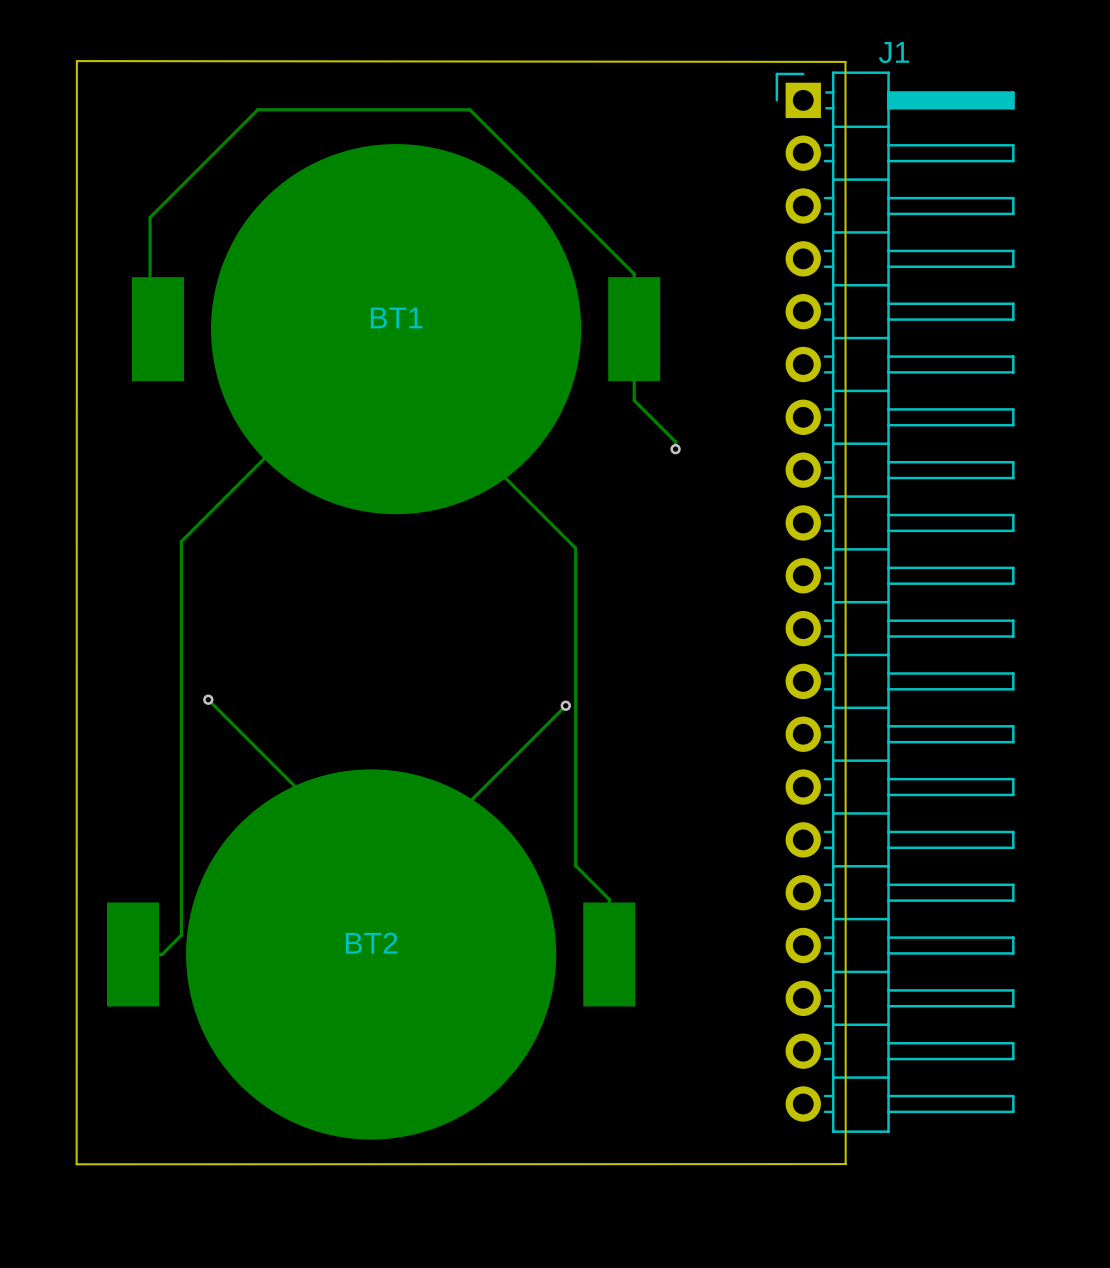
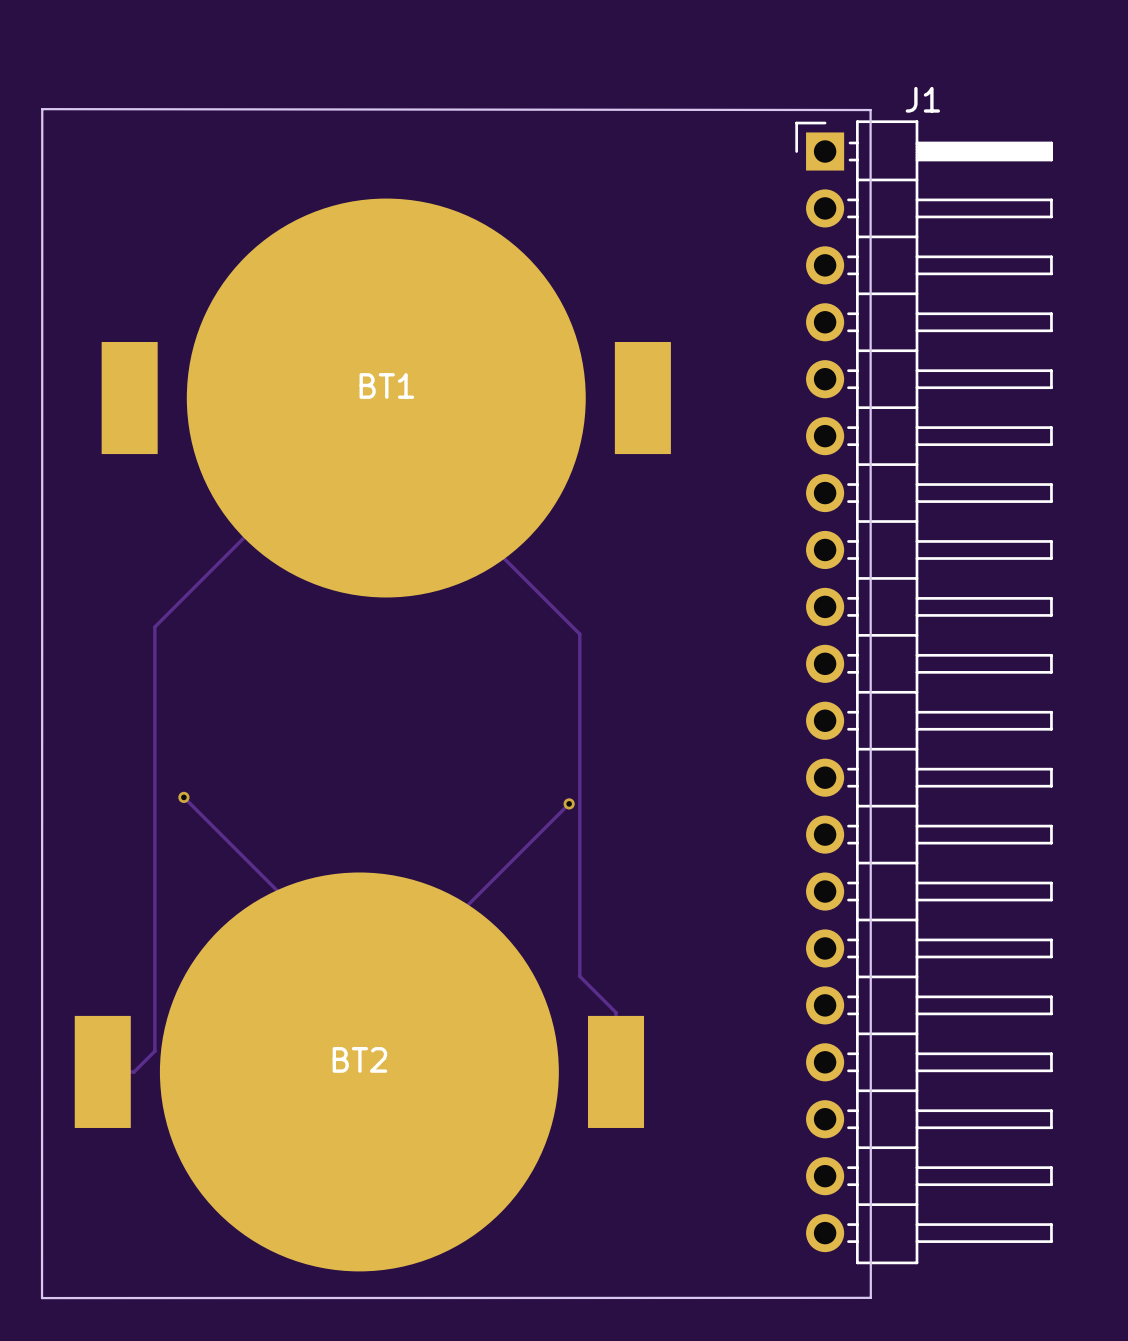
track: (634, 329) (634, 274) (469, 109) (257, 109) (150, 217) (151, 351) -> none
track: (634, 329) (634, 400) (675, 441) (675, 449) -> none
via: (675, 449) -> none

